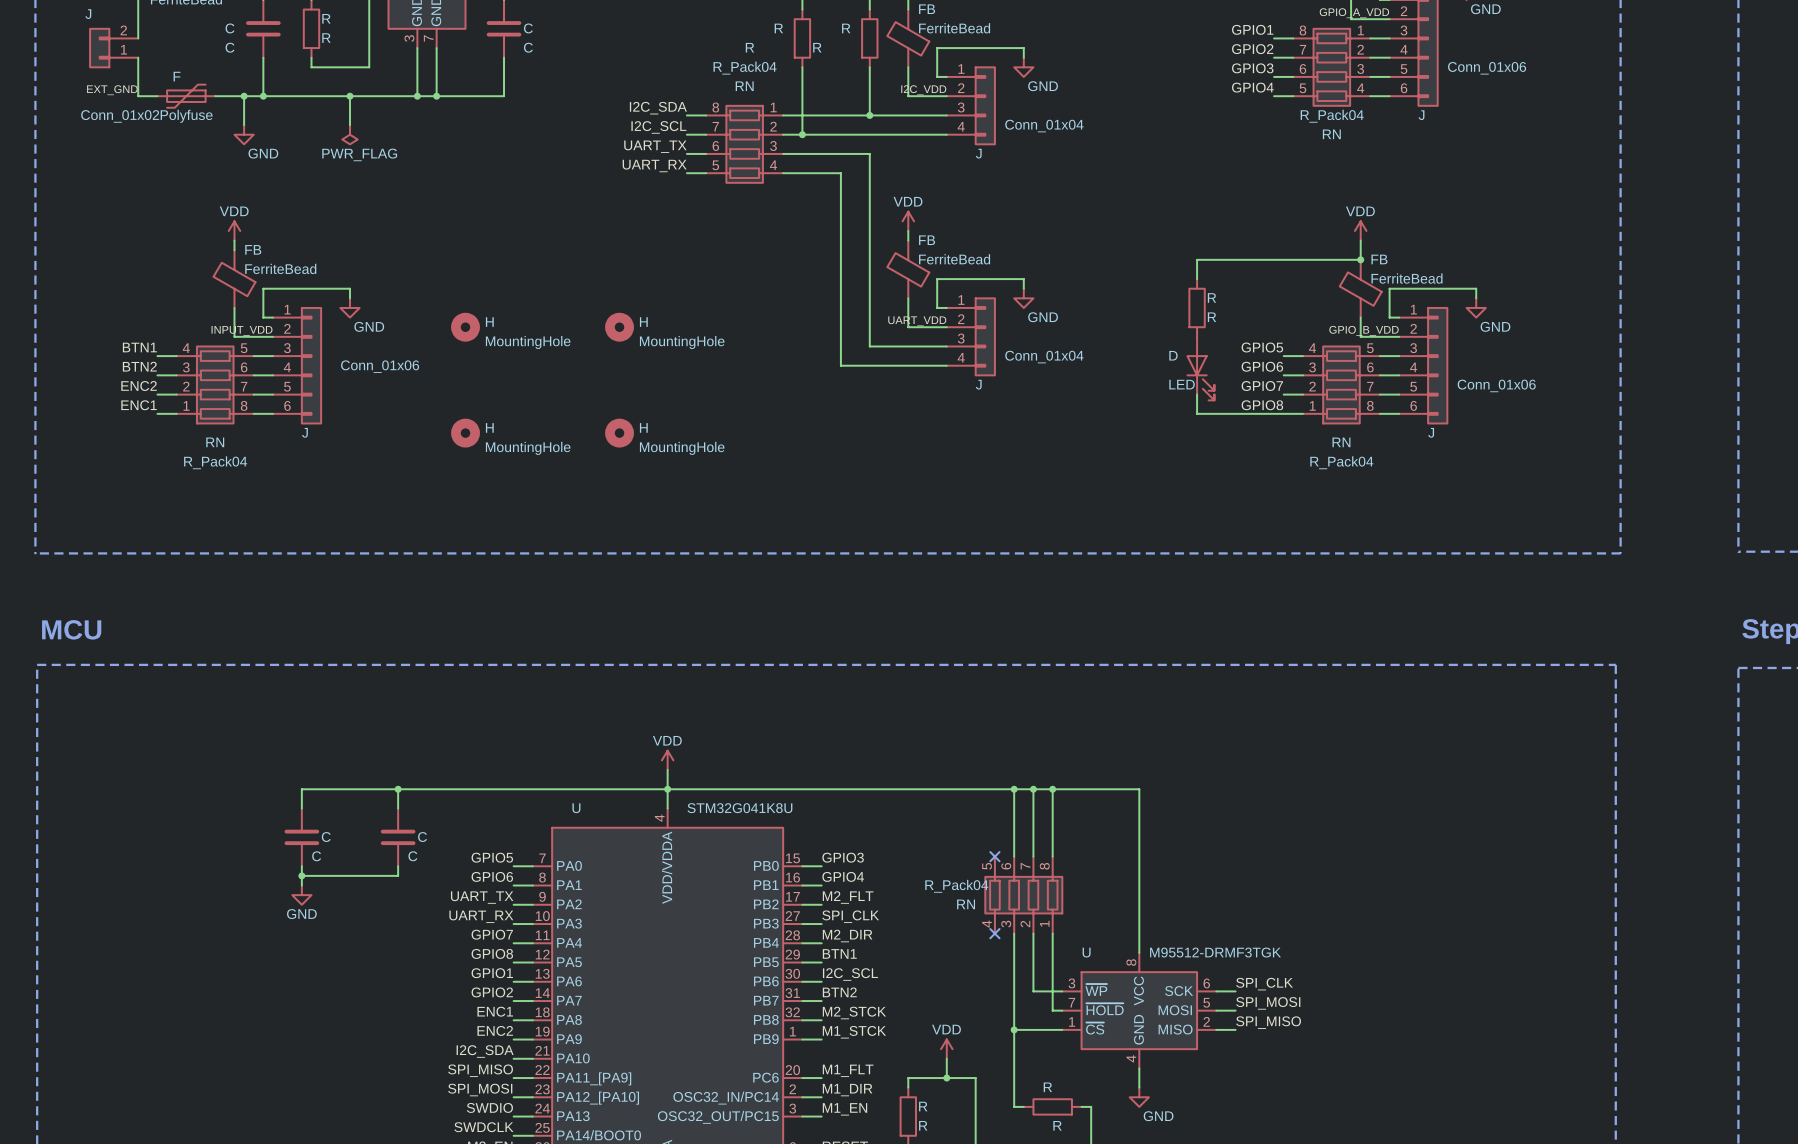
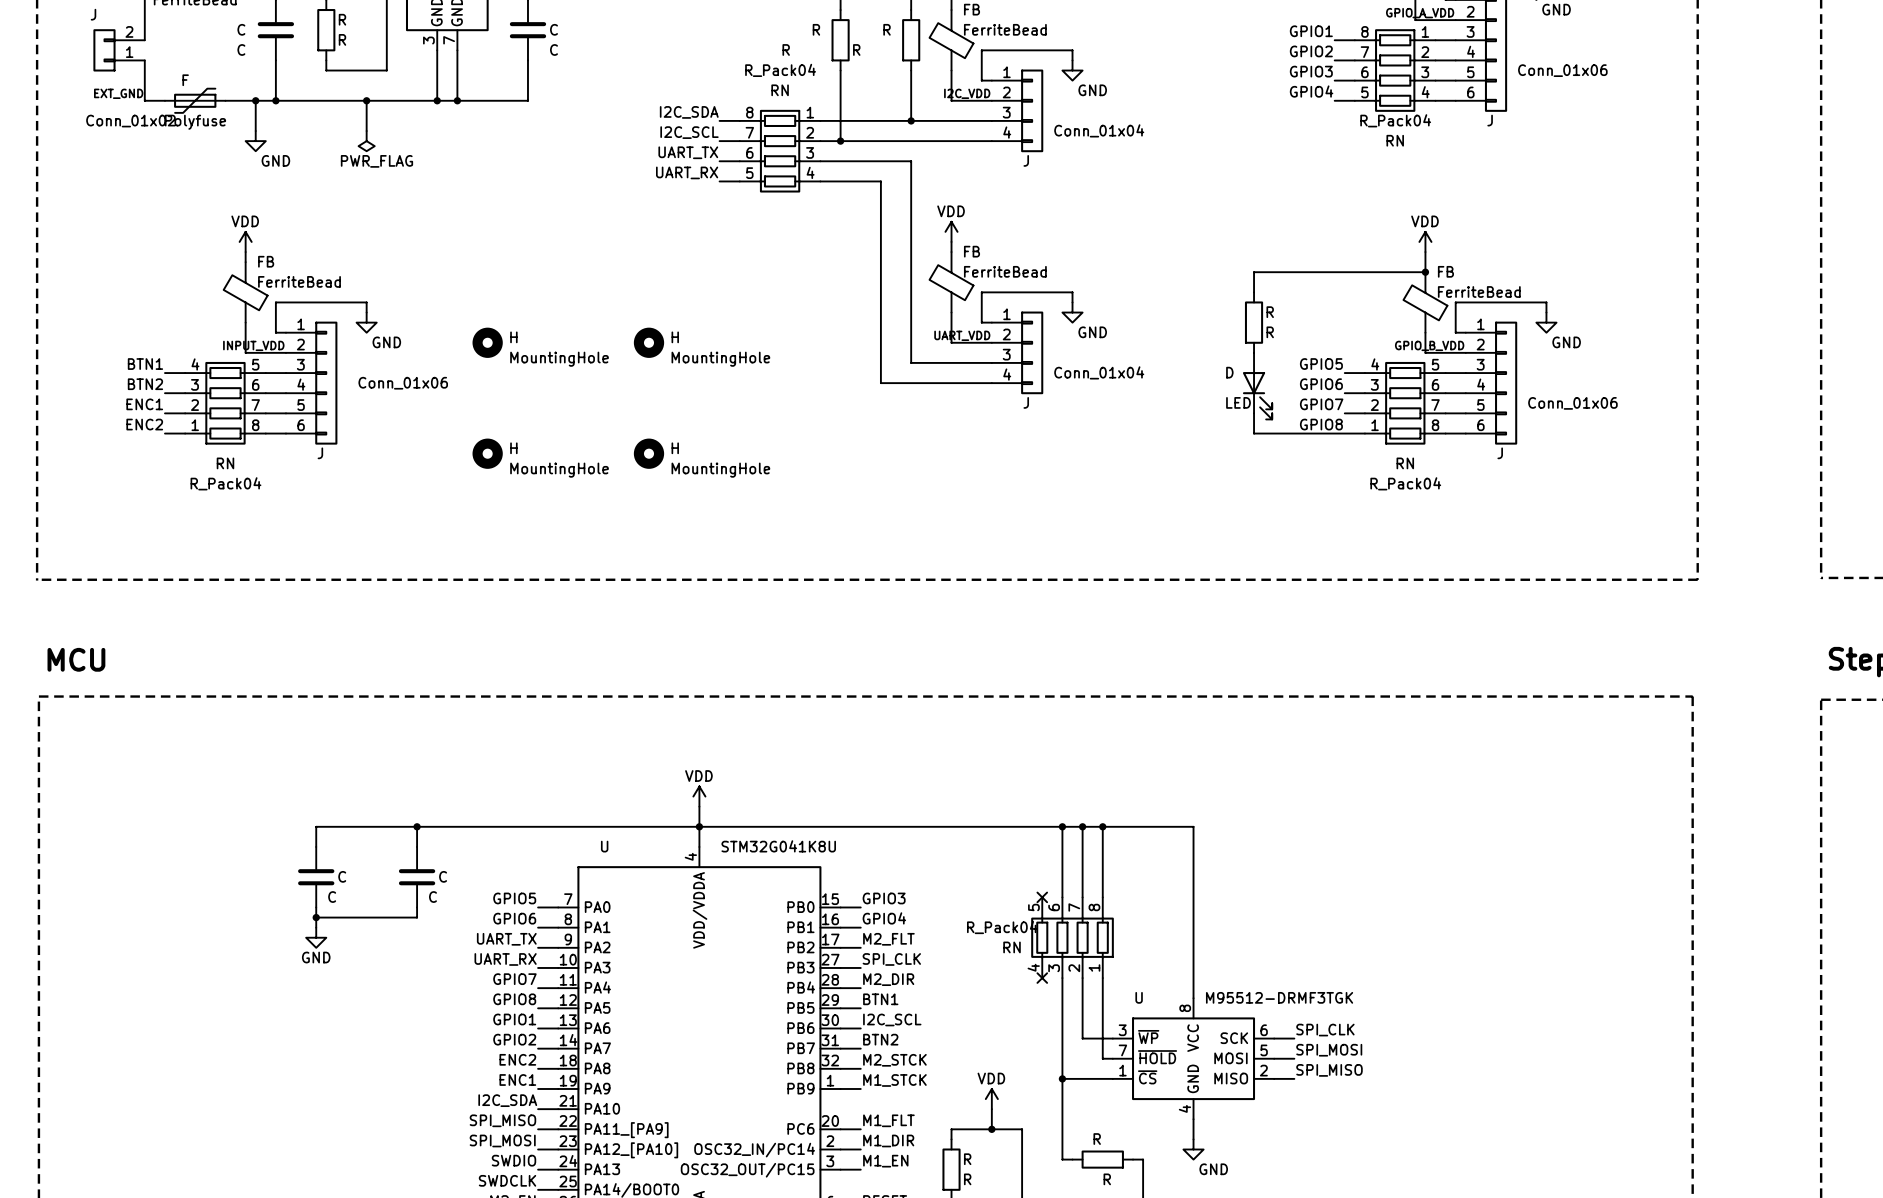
label: ENC2 (139, 386) -> ENC1 (144, 404)
label: ENC1 (139, 405) -> ENC2 (144, 424)
label: ENC1 (495, 1011) -> ENC2 (517, 1059)
label: ENC2 (495, 1030) -> ENC1 (517, 1079)

